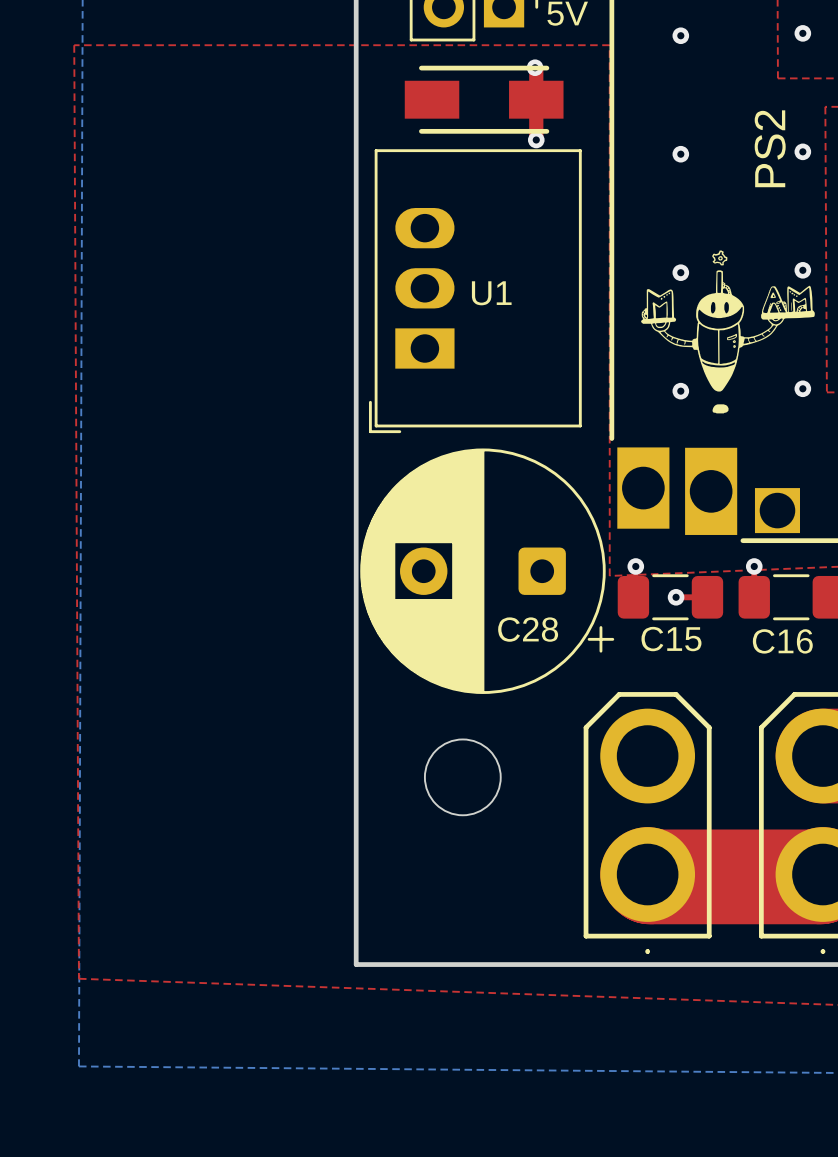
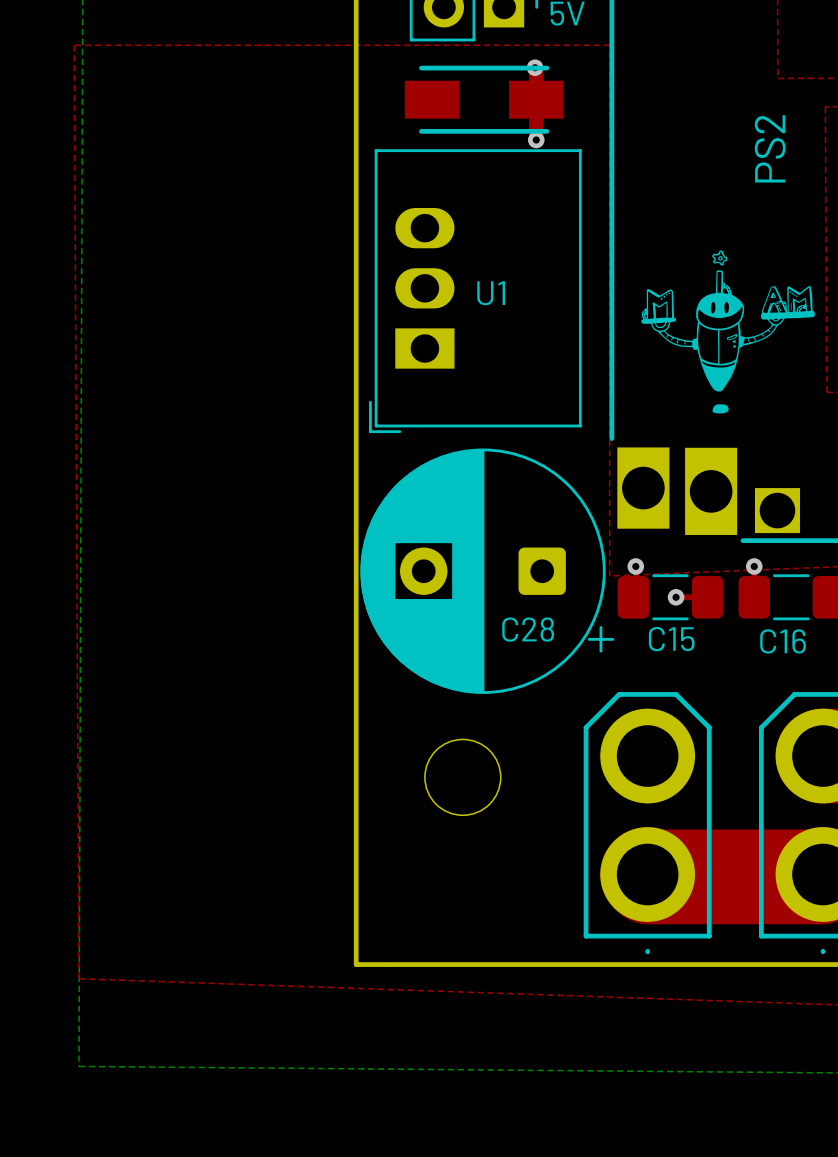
via: (802, 33) -> none
via: (680, 35) -> none
via: (802, 151) -> none
via: (680, 154) -> none
via: (802, 270) -> none
via: (680, 272) -> none
via: (802, 388) -> none
via: (680, 391) -> none

